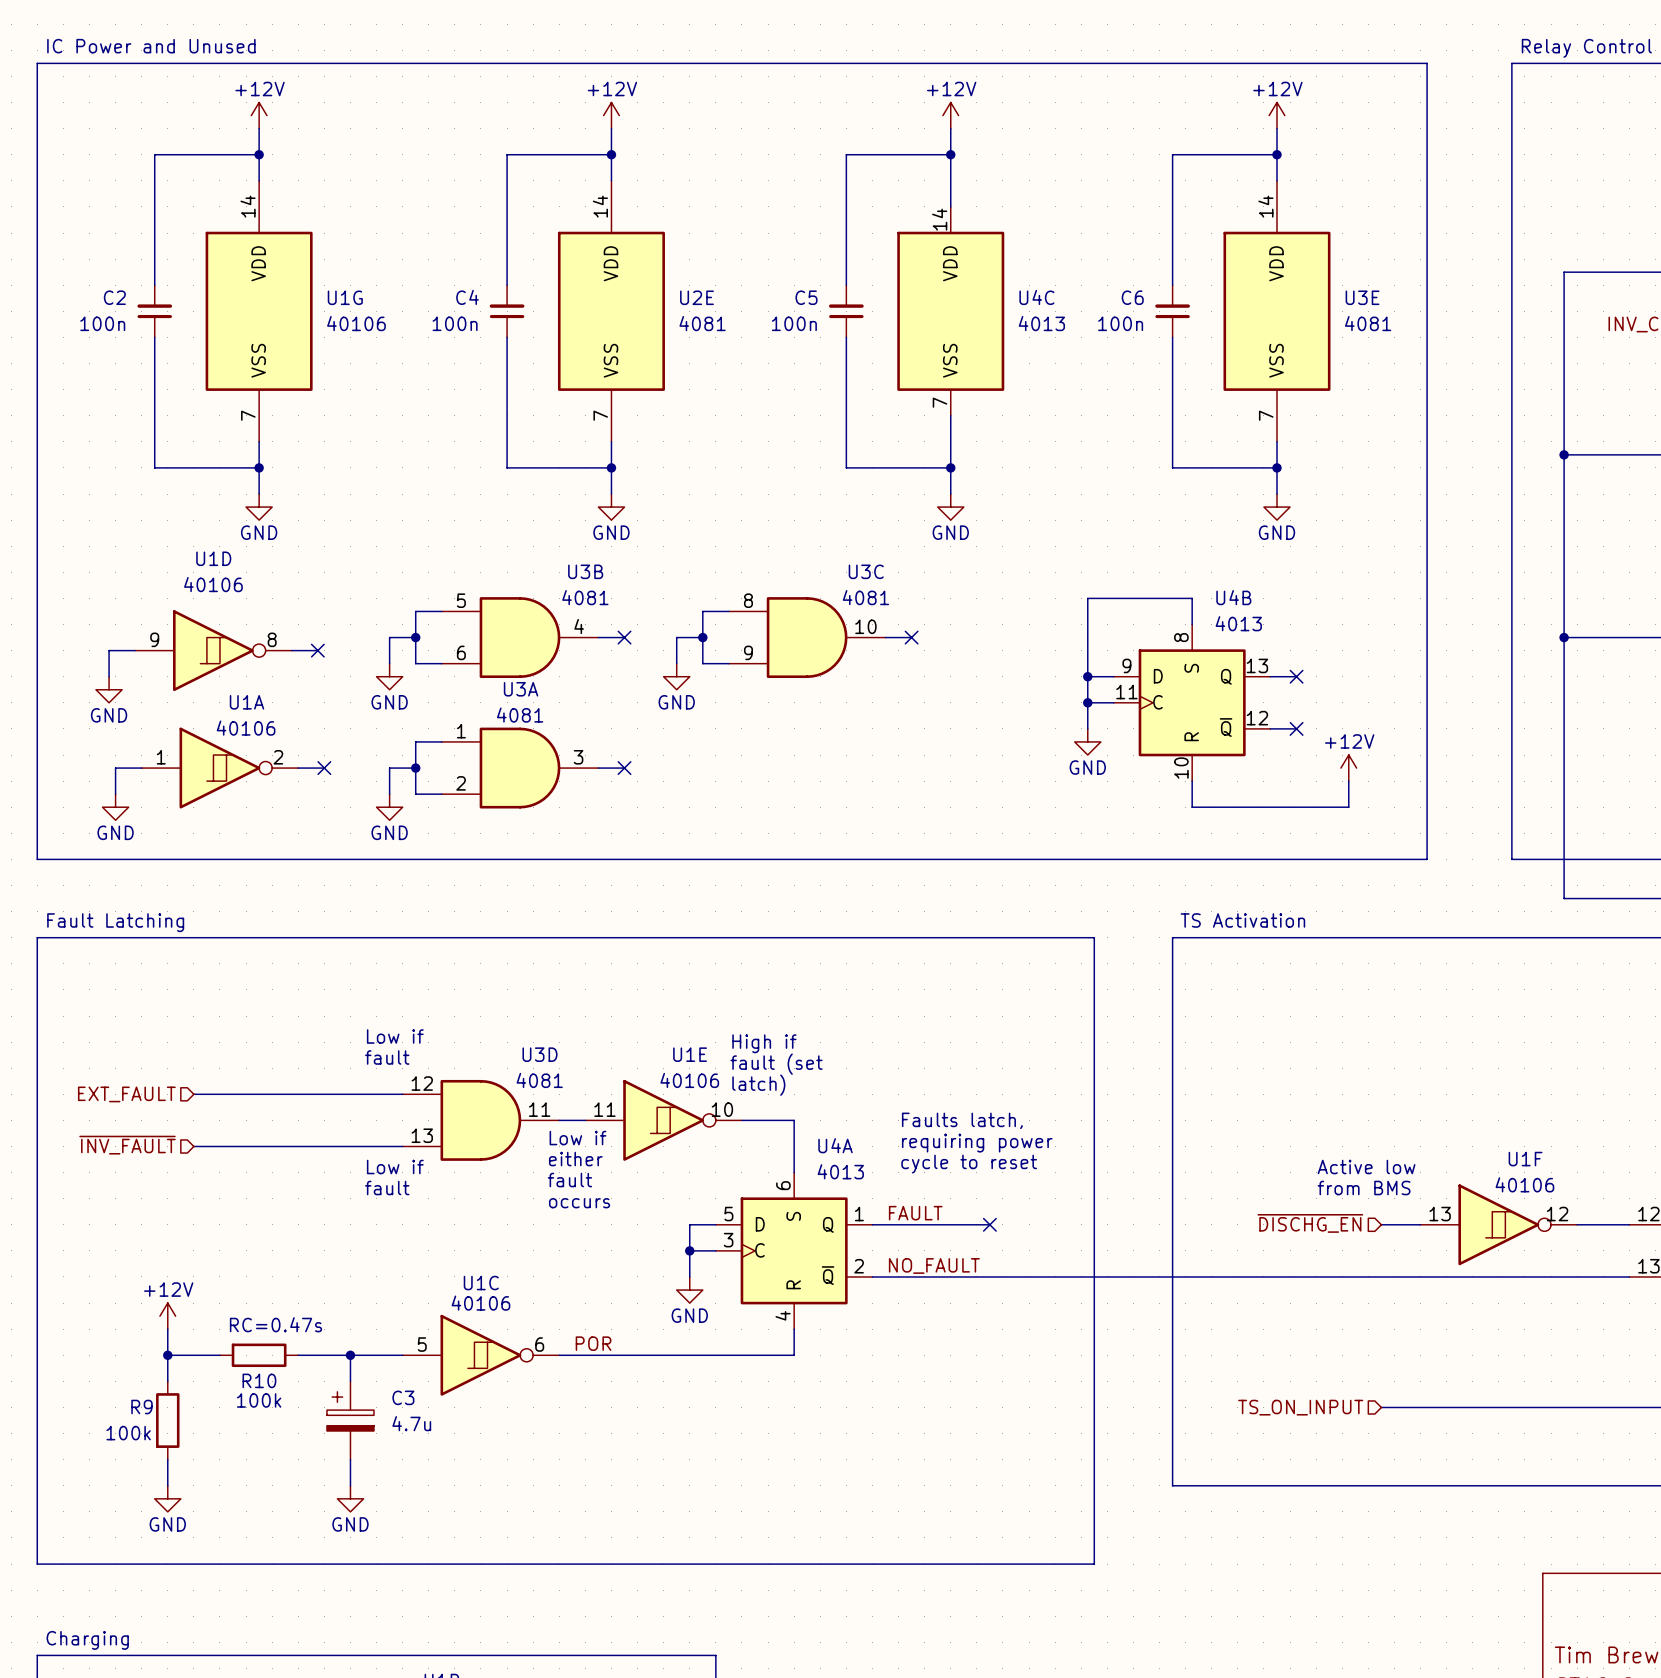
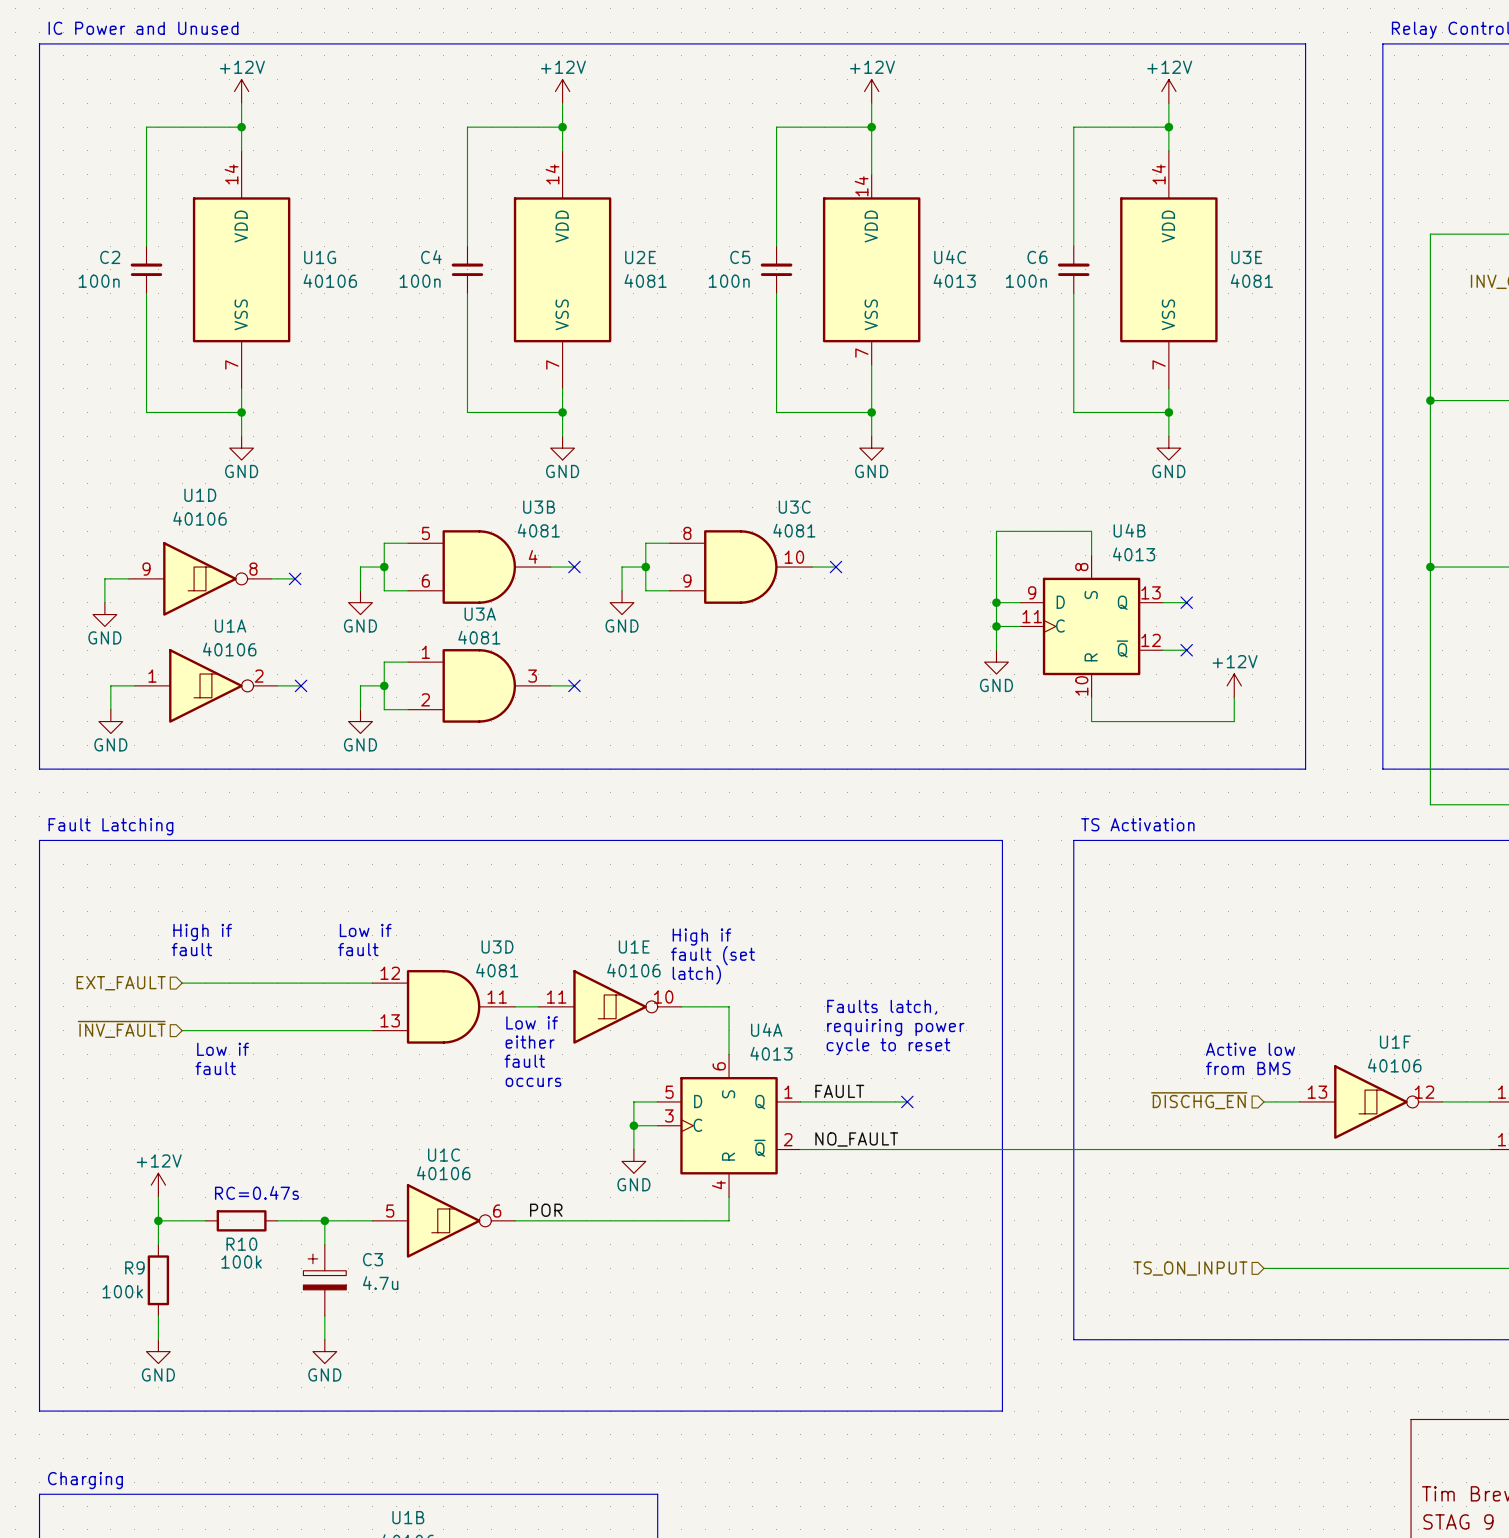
text: none -> High if (202, 932)
text: none -> fault (191, 949)
text position: Low if (395, 1166) -> Low if (223, 1049)
text: none -> fault (215, 1068)
text: fault (387, 1188) -> none

